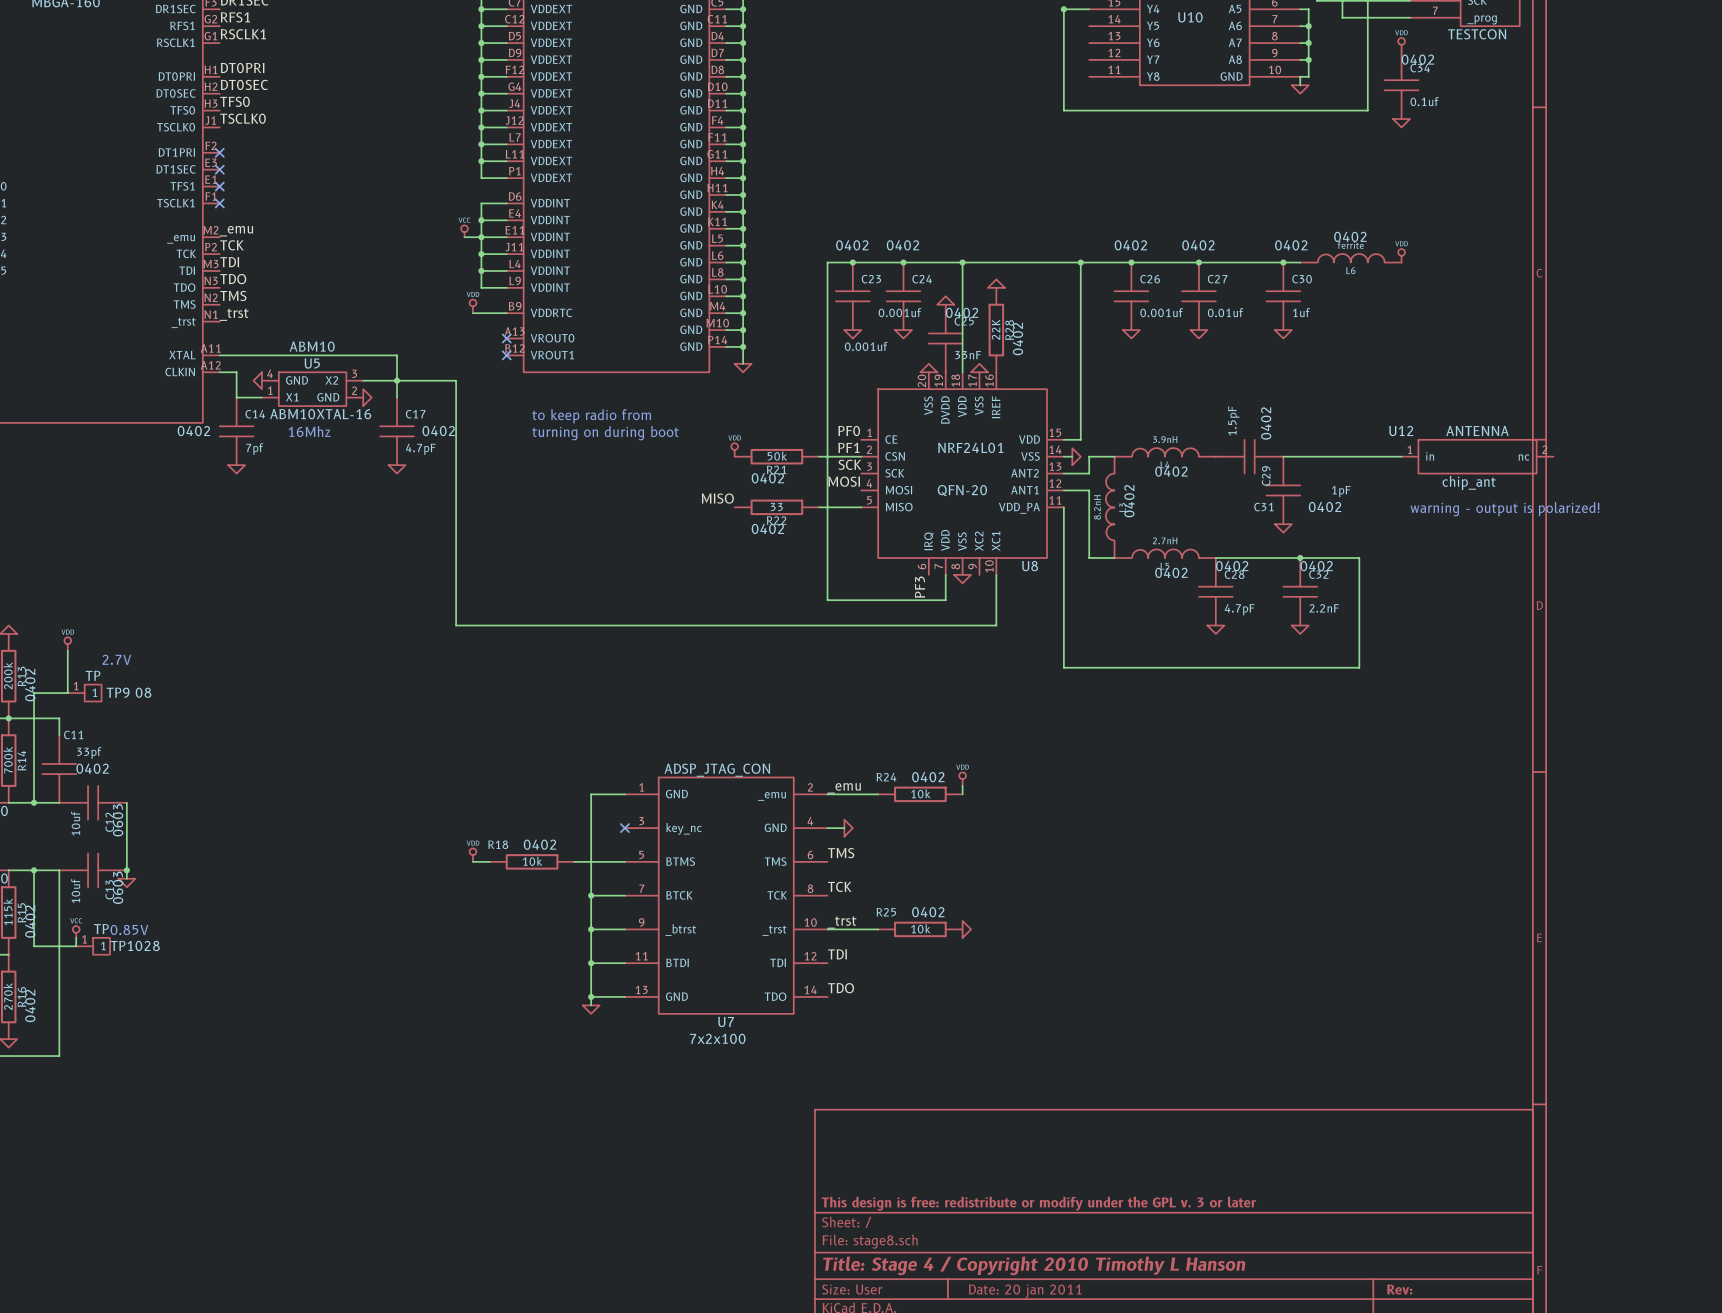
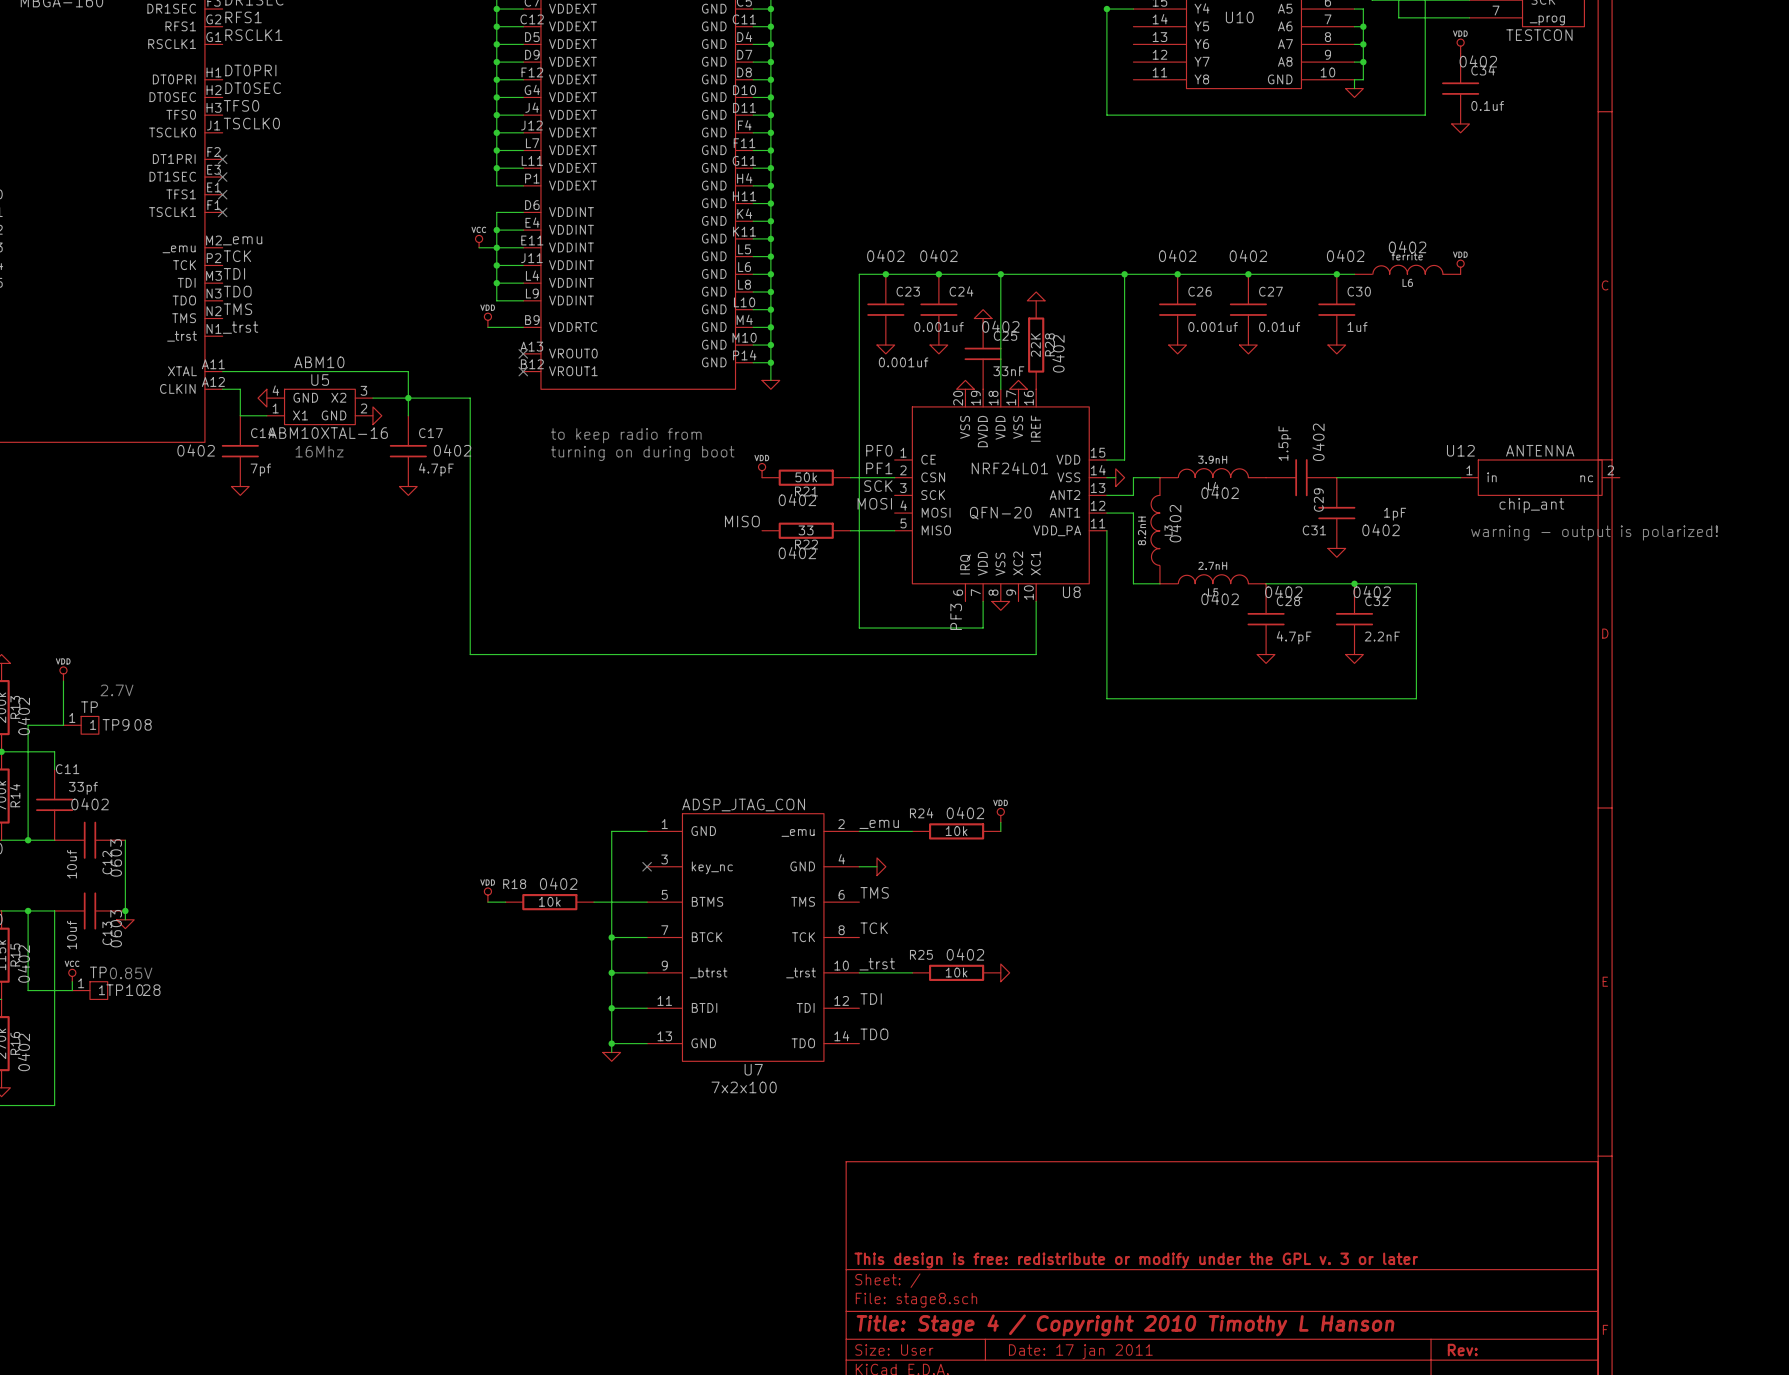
title block: Date: 20 jan 2011 (1025, 1291) -> Date: 17 jan 2011 (1080, 1351)

